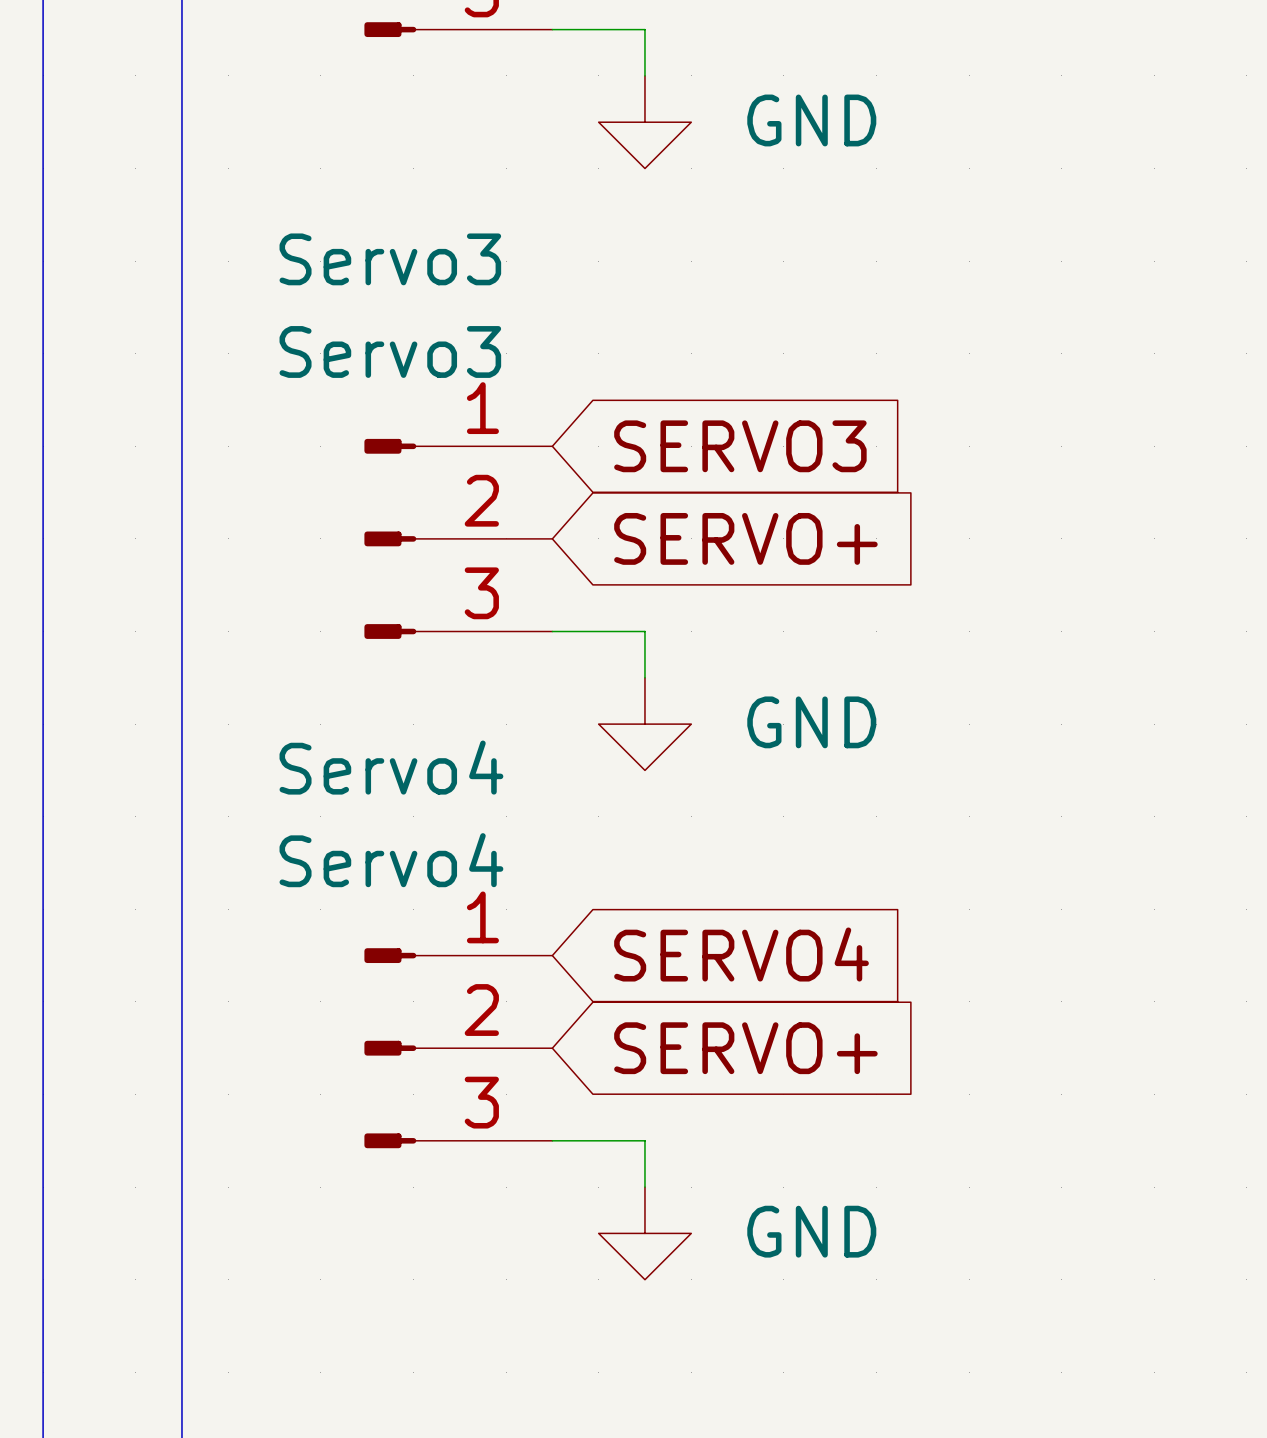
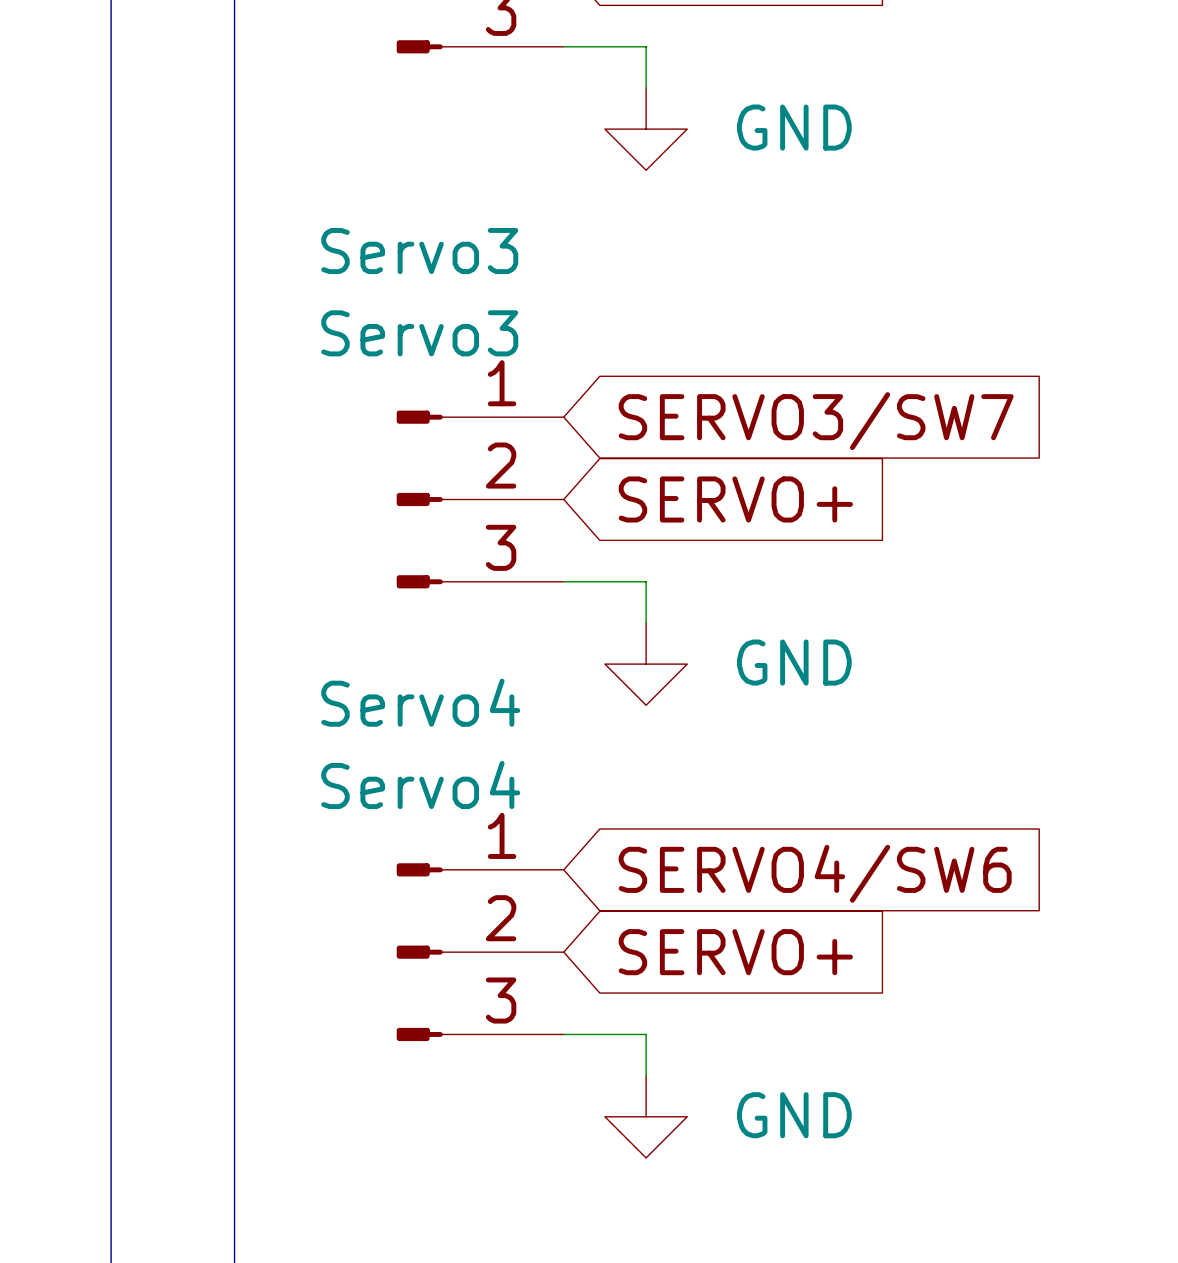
global label: SERVO3 (740, 446) -> SERVO3/SW7 (816, 421)
global label: SERVO4 (741, 954) -> SERVO4/SW6 (815, 873)

